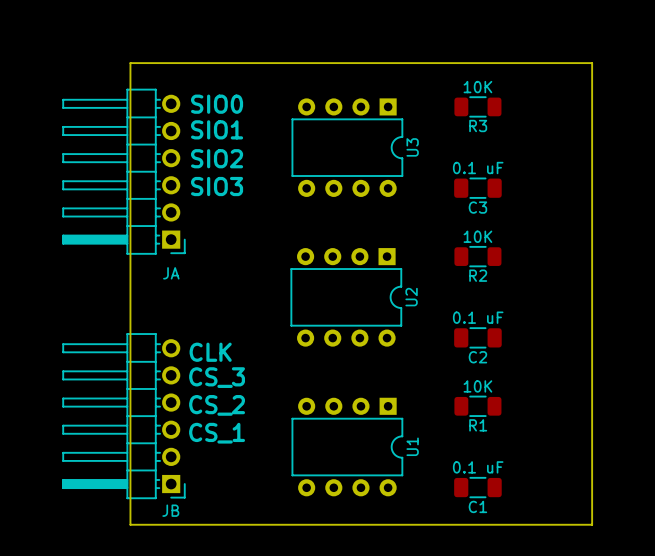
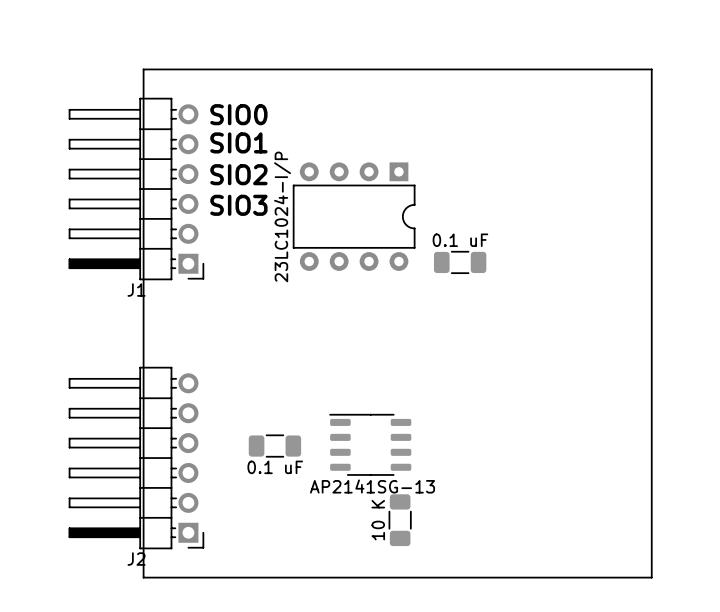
R3: 10K (477, 106) -> none
U3: (347, 147) -> none
C3: 0.1 uF (477, 188) -> none
part: none -> 23LC1024-I/P (354, 216)
part: none -> 0.1 uF (460, 262)
R2: 10K (477, 256) -> none
JA name: JA (171, 273) -> J1 (136, 290)
U2: (346, 297) -> none
C2: 0.1 uF (477, 337) -> none
text: CLK (210, 352) -> none
text: CS_3 (217, 377) -> none
part: none -> AP2141SG-13 (370, 444)
text: CS_2 (217, 405) -> none
part: none -> 0.1 uF (274, 446)
R1: 10K (477, 406) -> none
text: CS_1 (217, 433) -> none
U1: (347, 447) -> none
part: none -> 10 K (400, 520)
C1: 0.1 uF (477, 487) -> none
JB name: JB (170, 510) -> J2 (136, 559)

